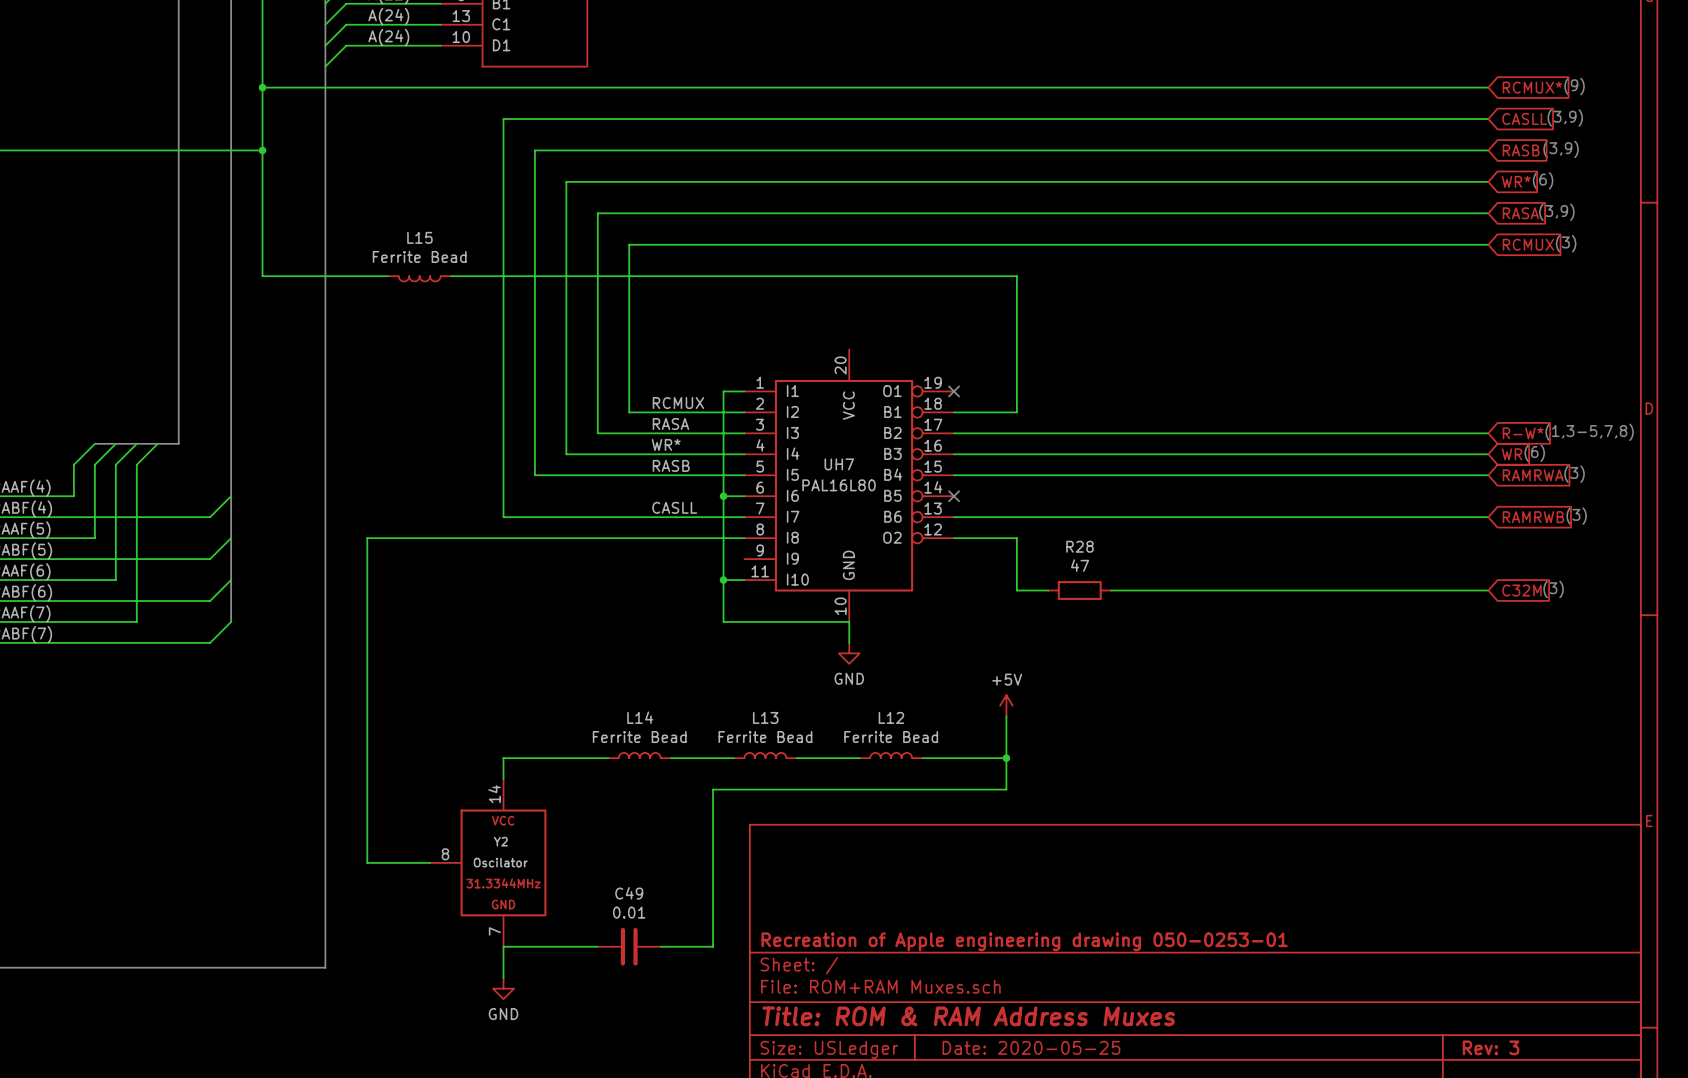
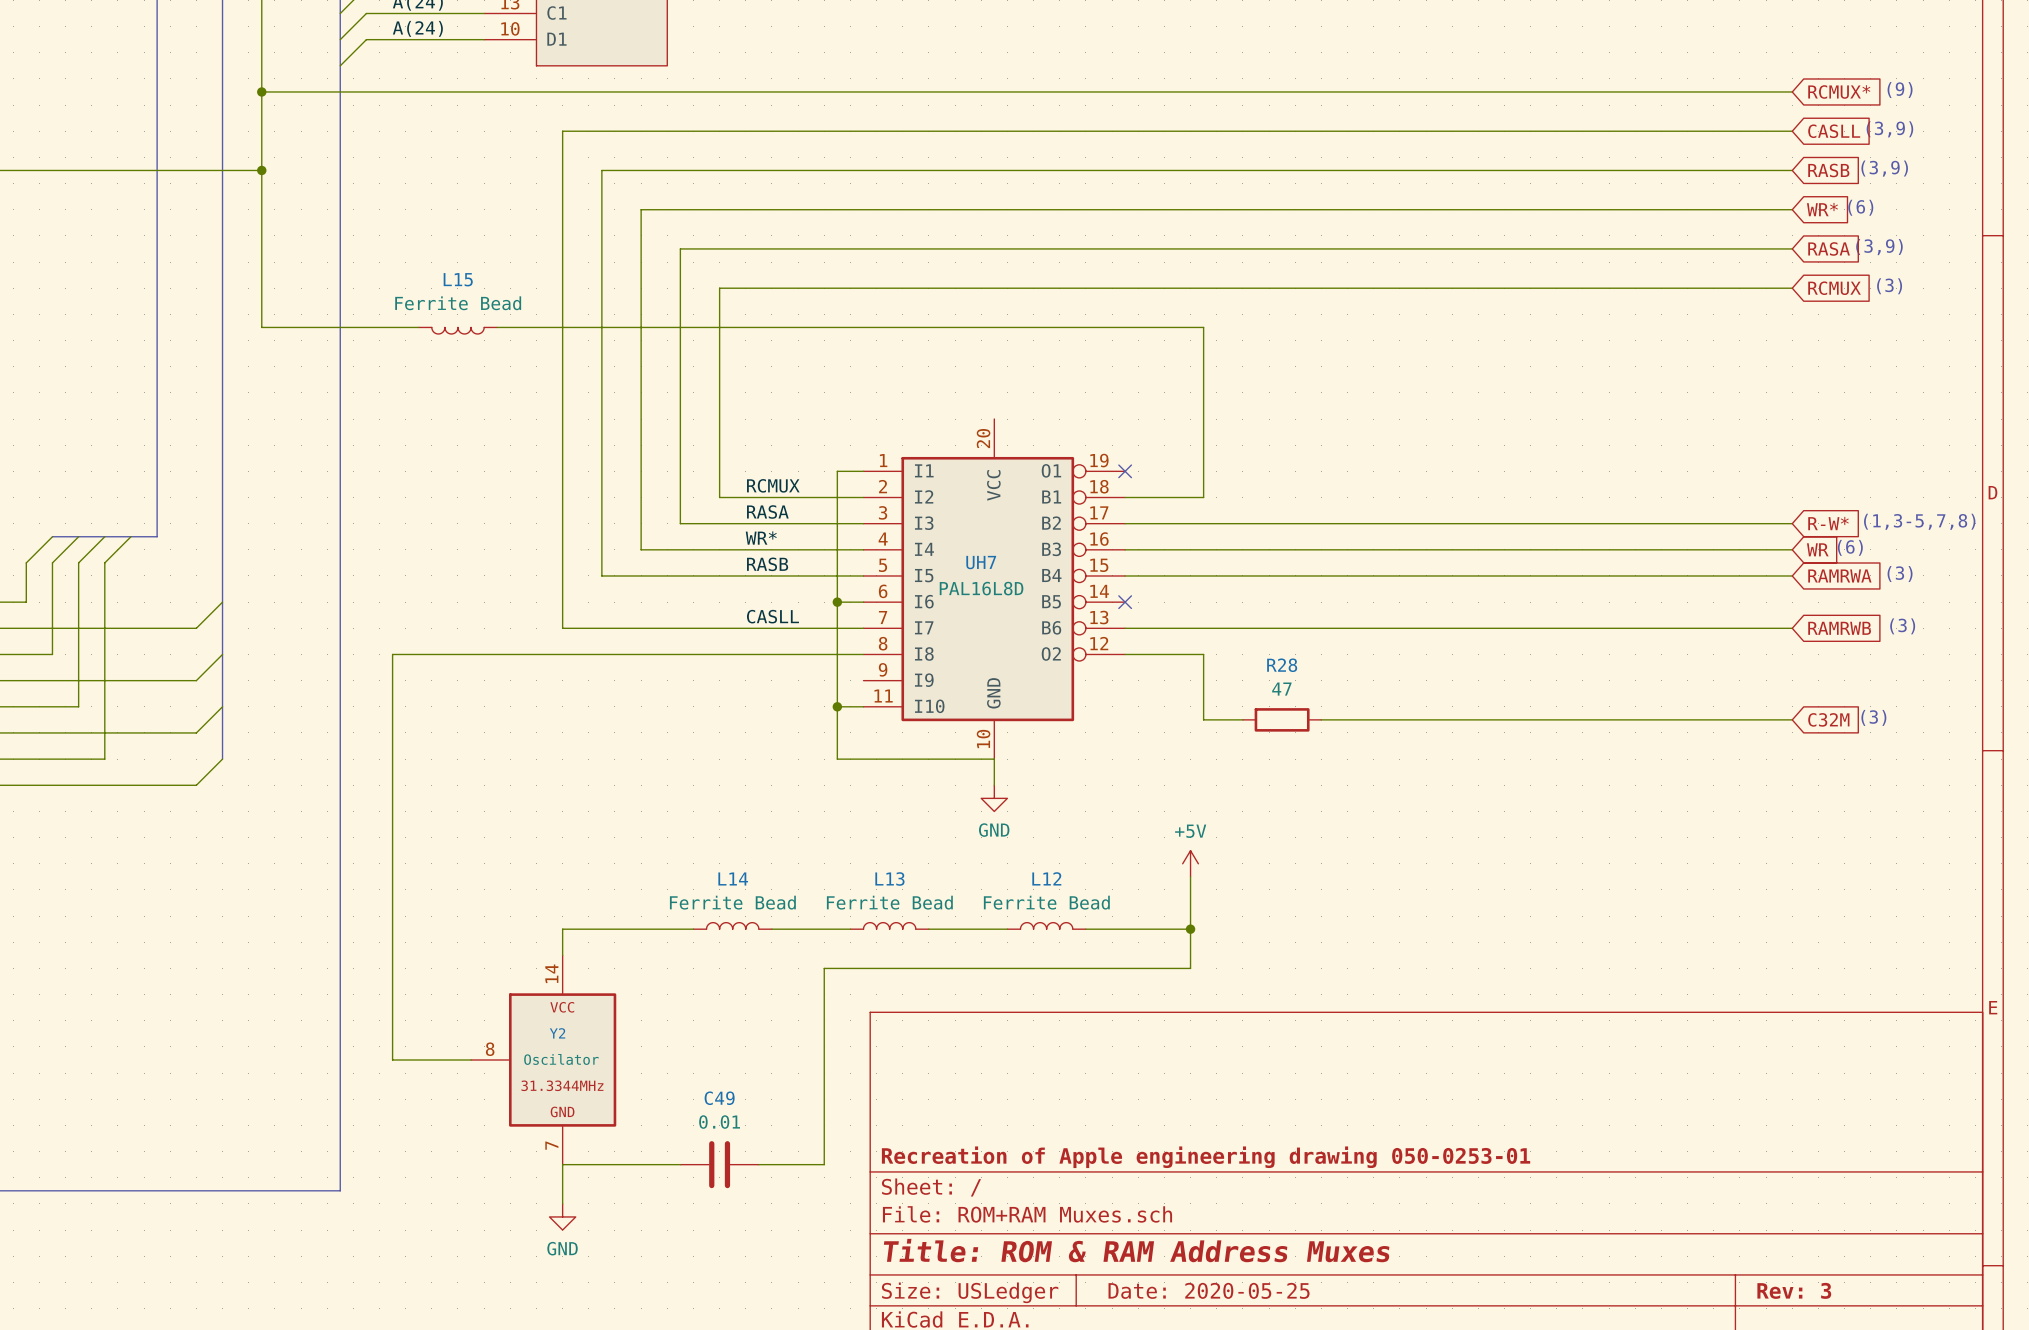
UH7 value: PAL16L80 (839, 485) -> PAL16L8D (981, 588)

